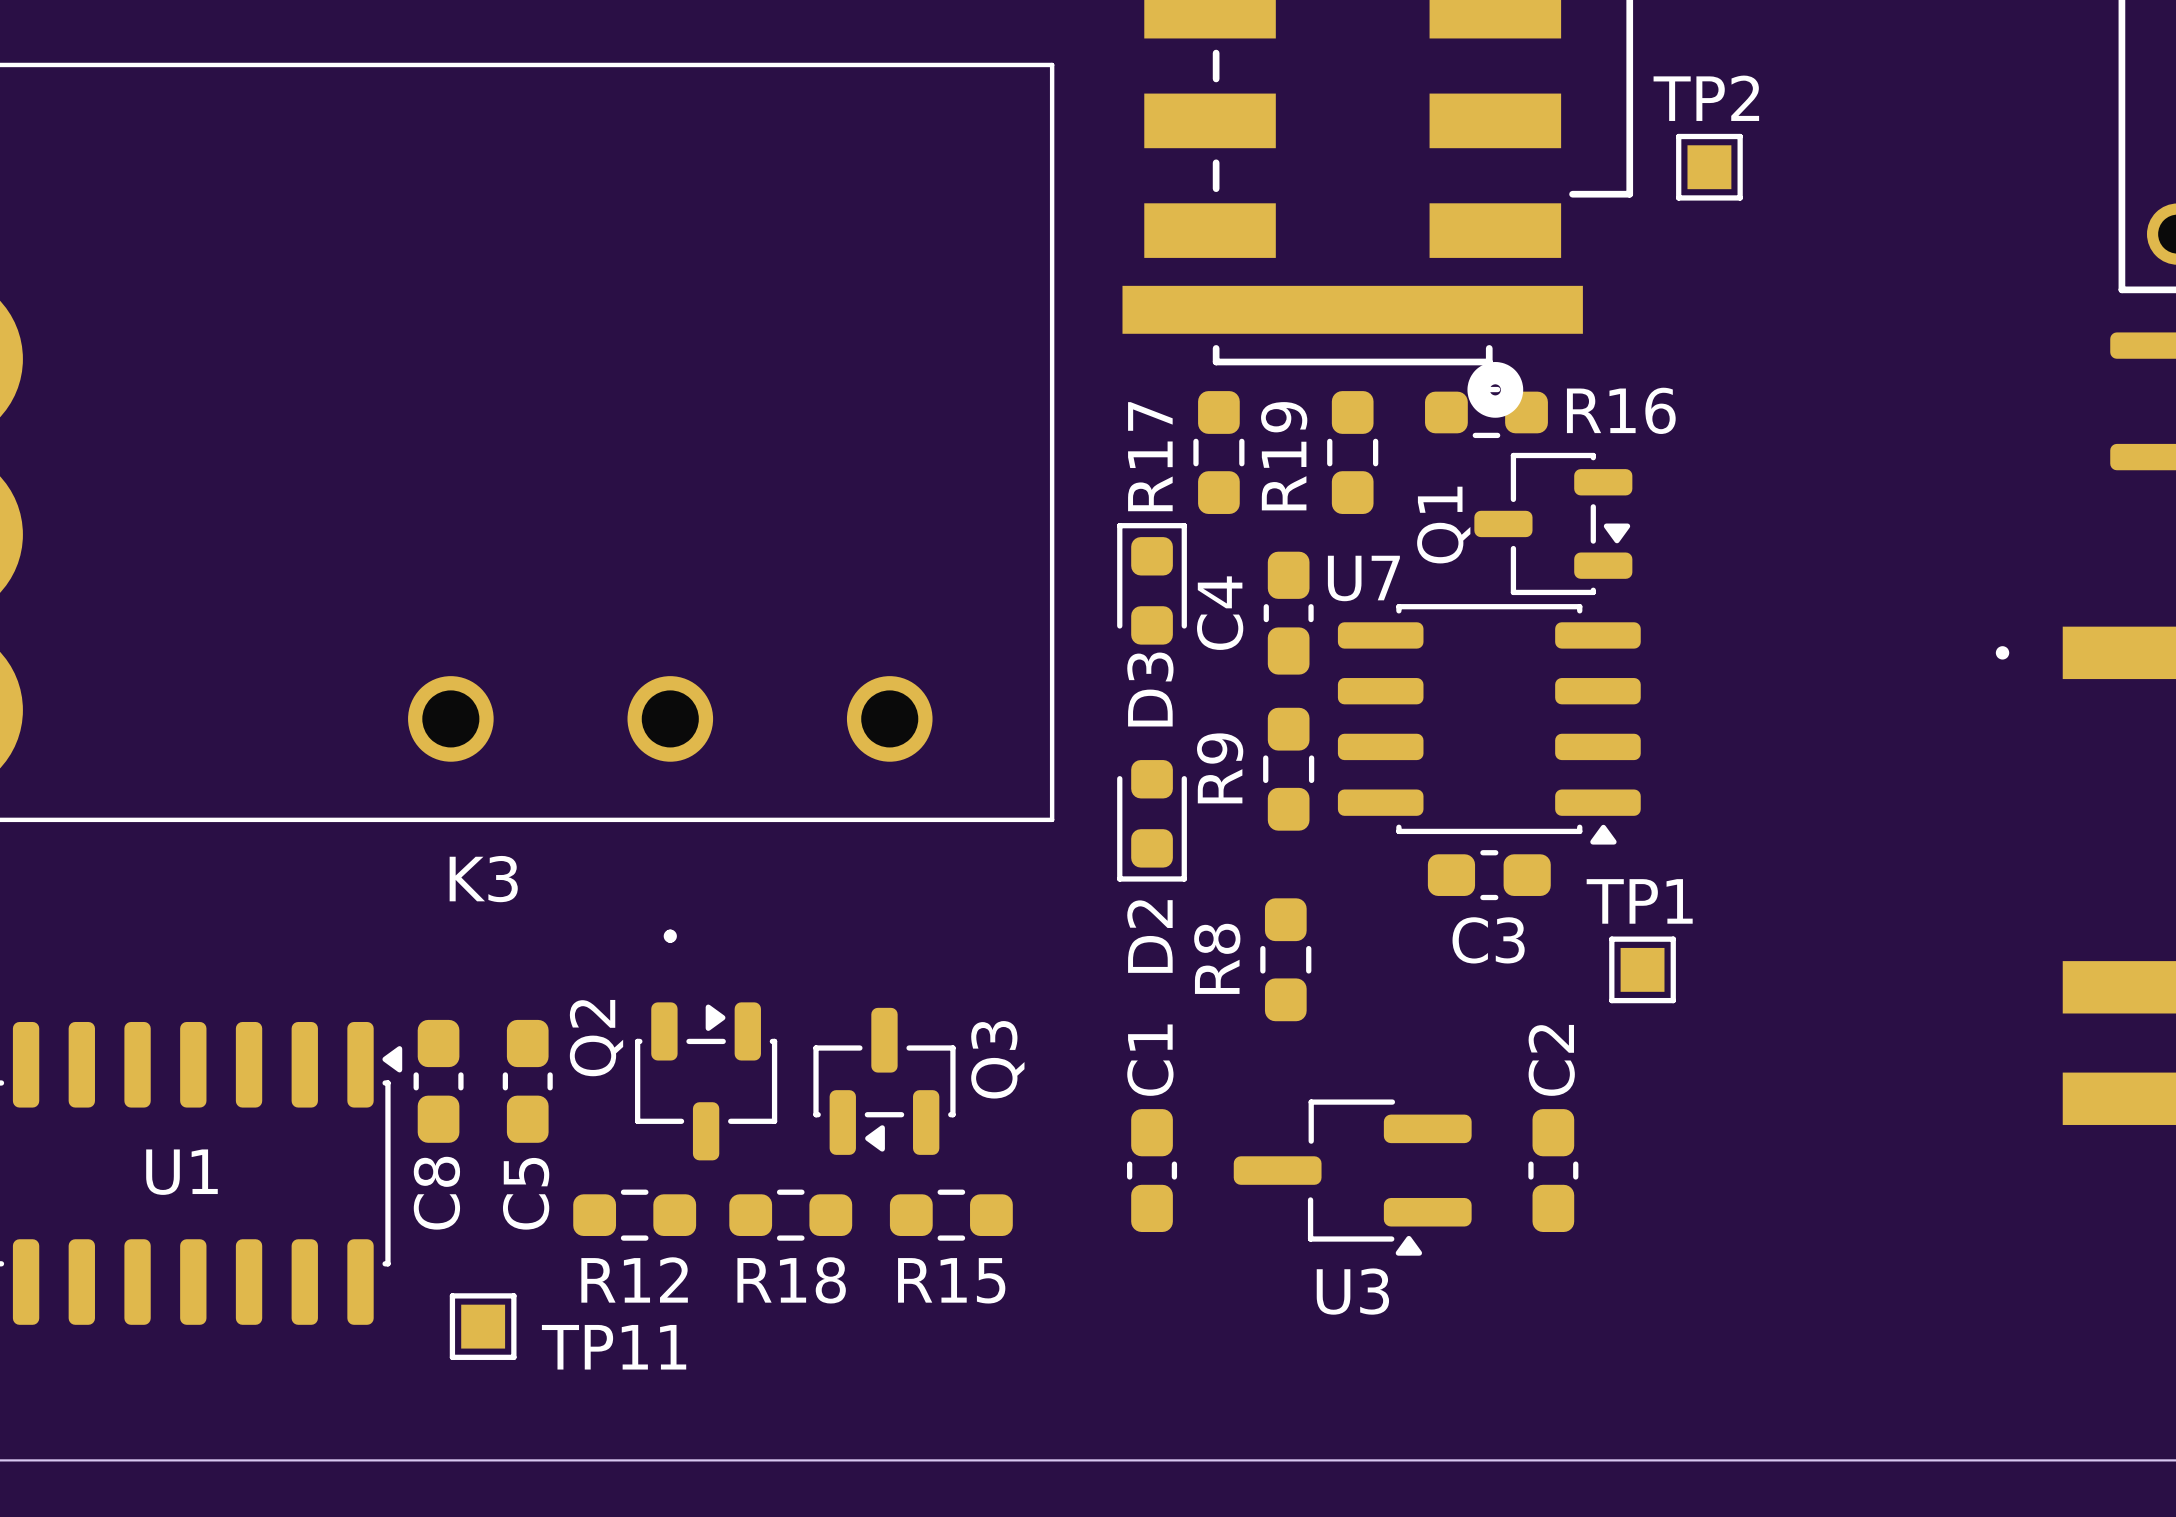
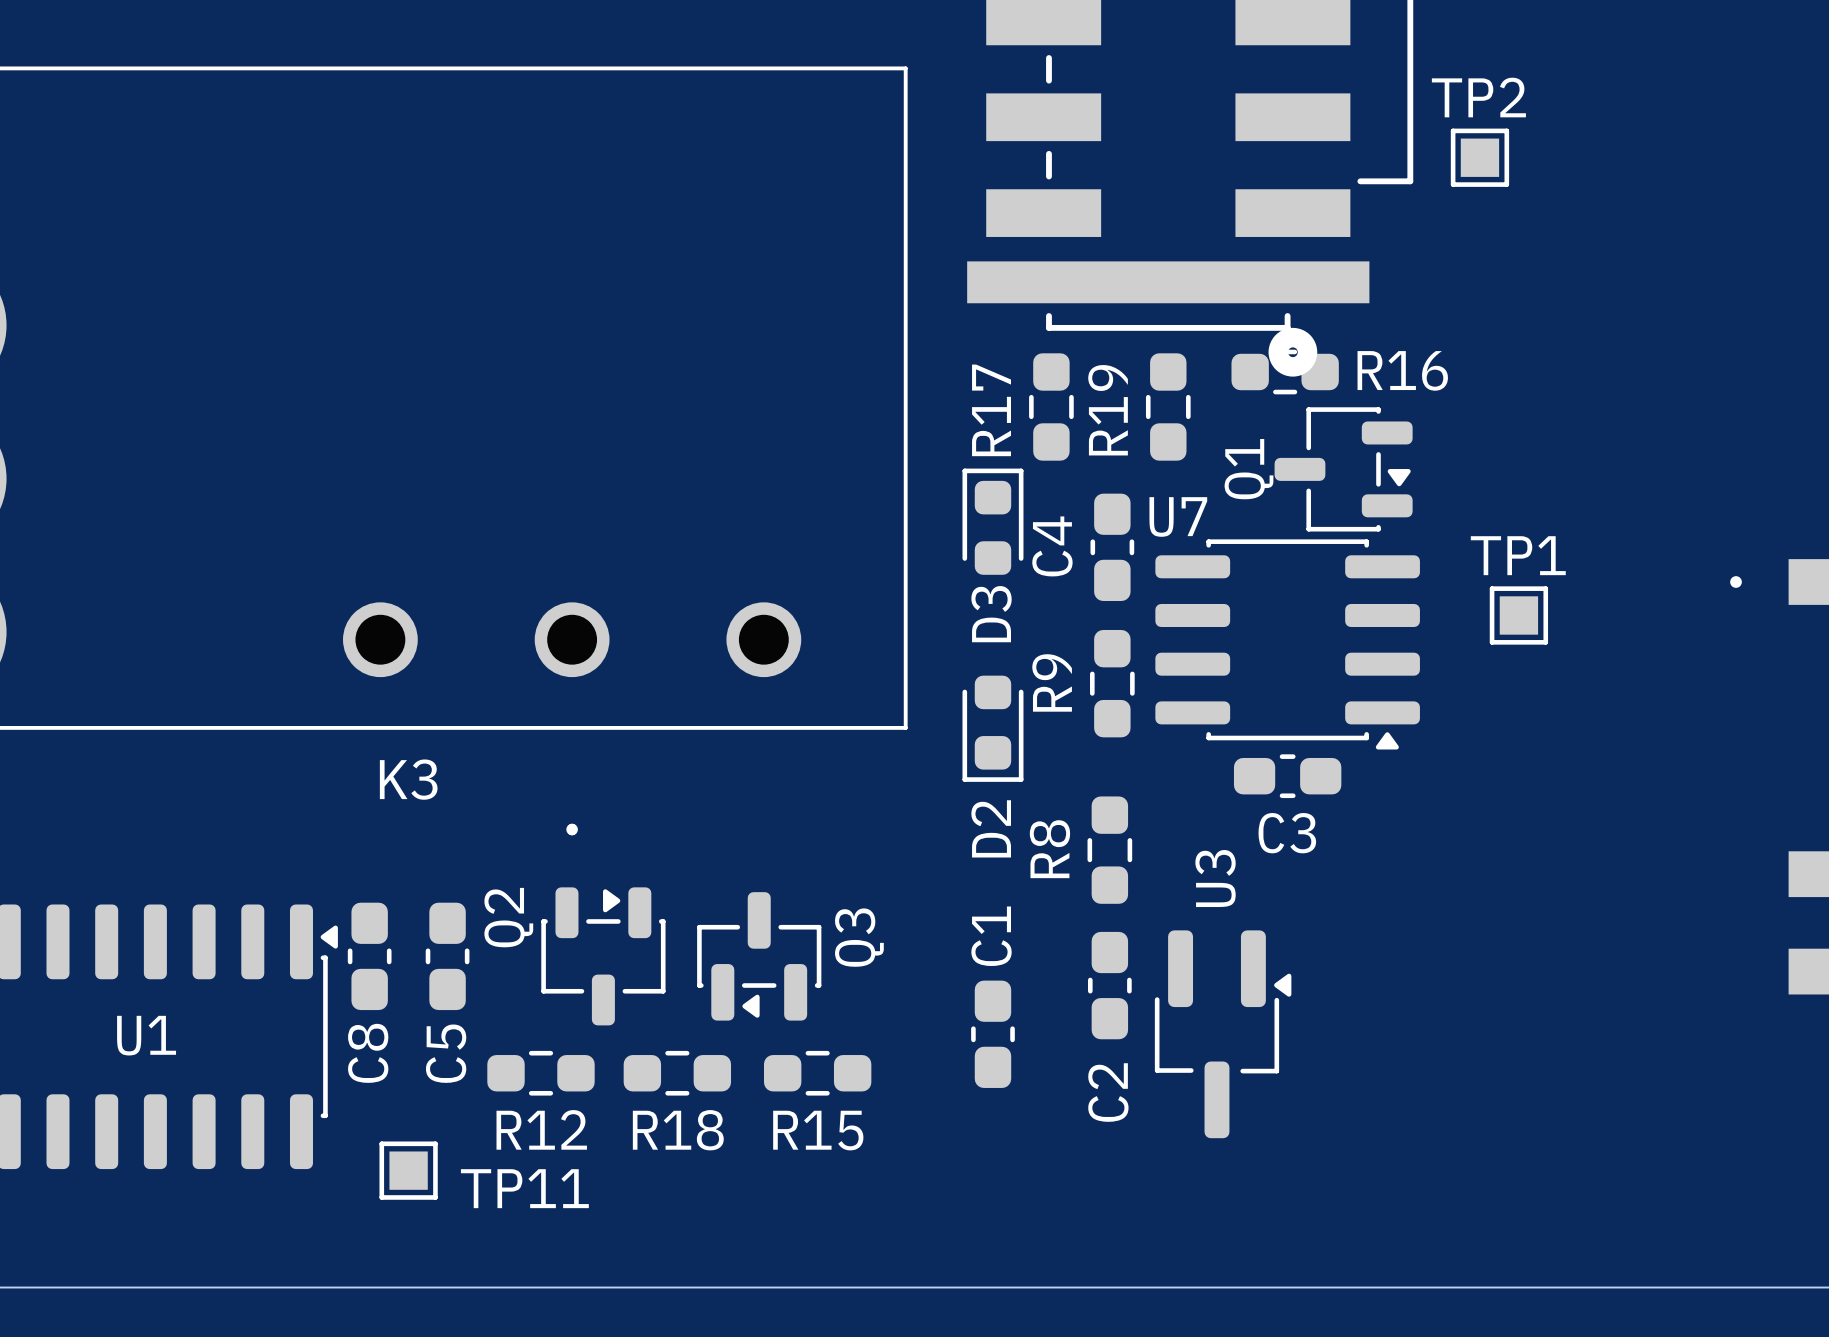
TP1 position: (1642, 969) -> (1518, 615)
C2 name position: C2 (1551, 1060) -> C2 (1108, 1092)
C2 position: (1553, 1170) -> (1109, 985)
U3 rotation: 0° (1352, 1177) -> 90° counterclockwise (1223, 1034)
U3 name position: U3 (1352, 1291) -> U3 (1215, 878)

